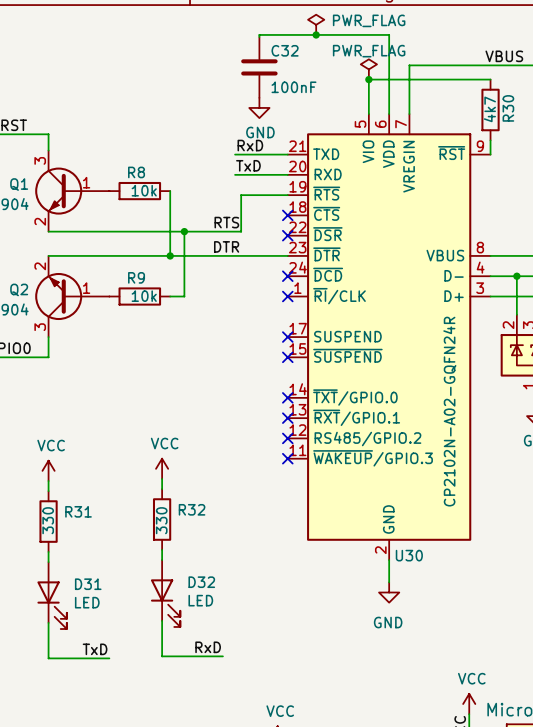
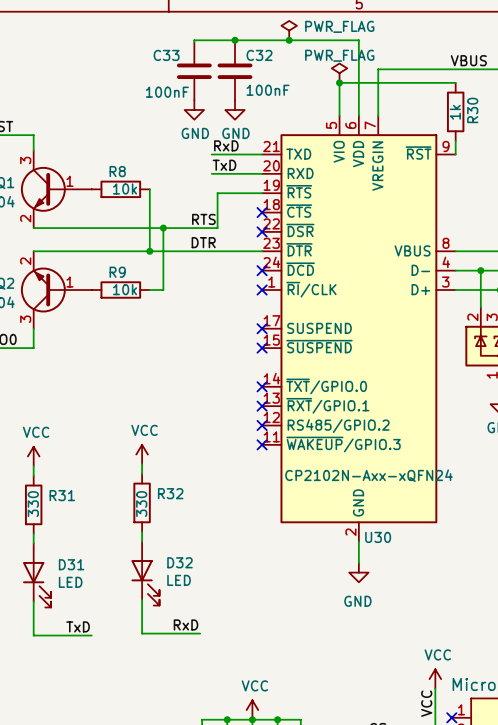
wire: none -> (235, 40) (194, 40) (194, 42)
junction: none -> (235, 40)
C33: none -> 100nF (194, 71)
power symbol: none -> GND (194, 109)
R30 value: 4k7 (489, 109) -> 1k (455, 112)
U30 value: CP2102N-A02-GQFN24R (449, 411) -> CP2102N-Axx-xQFN24 (368, 475)

